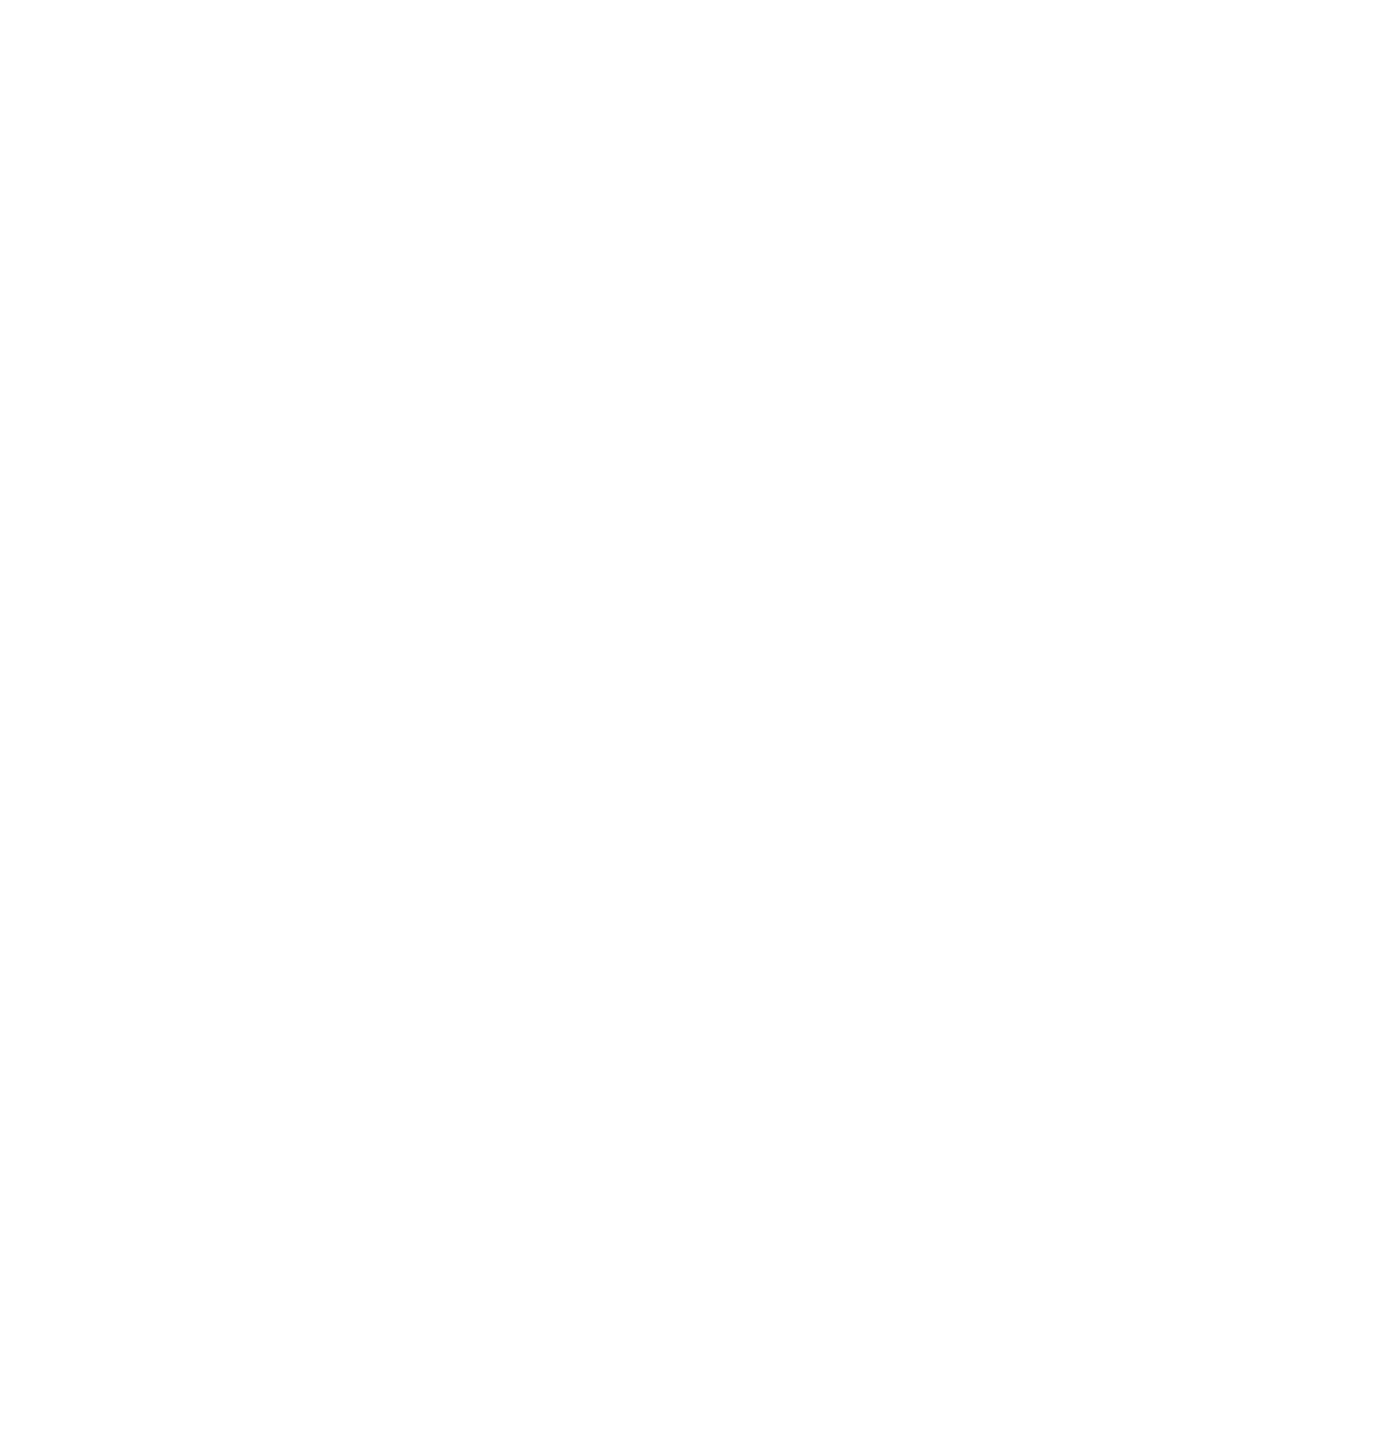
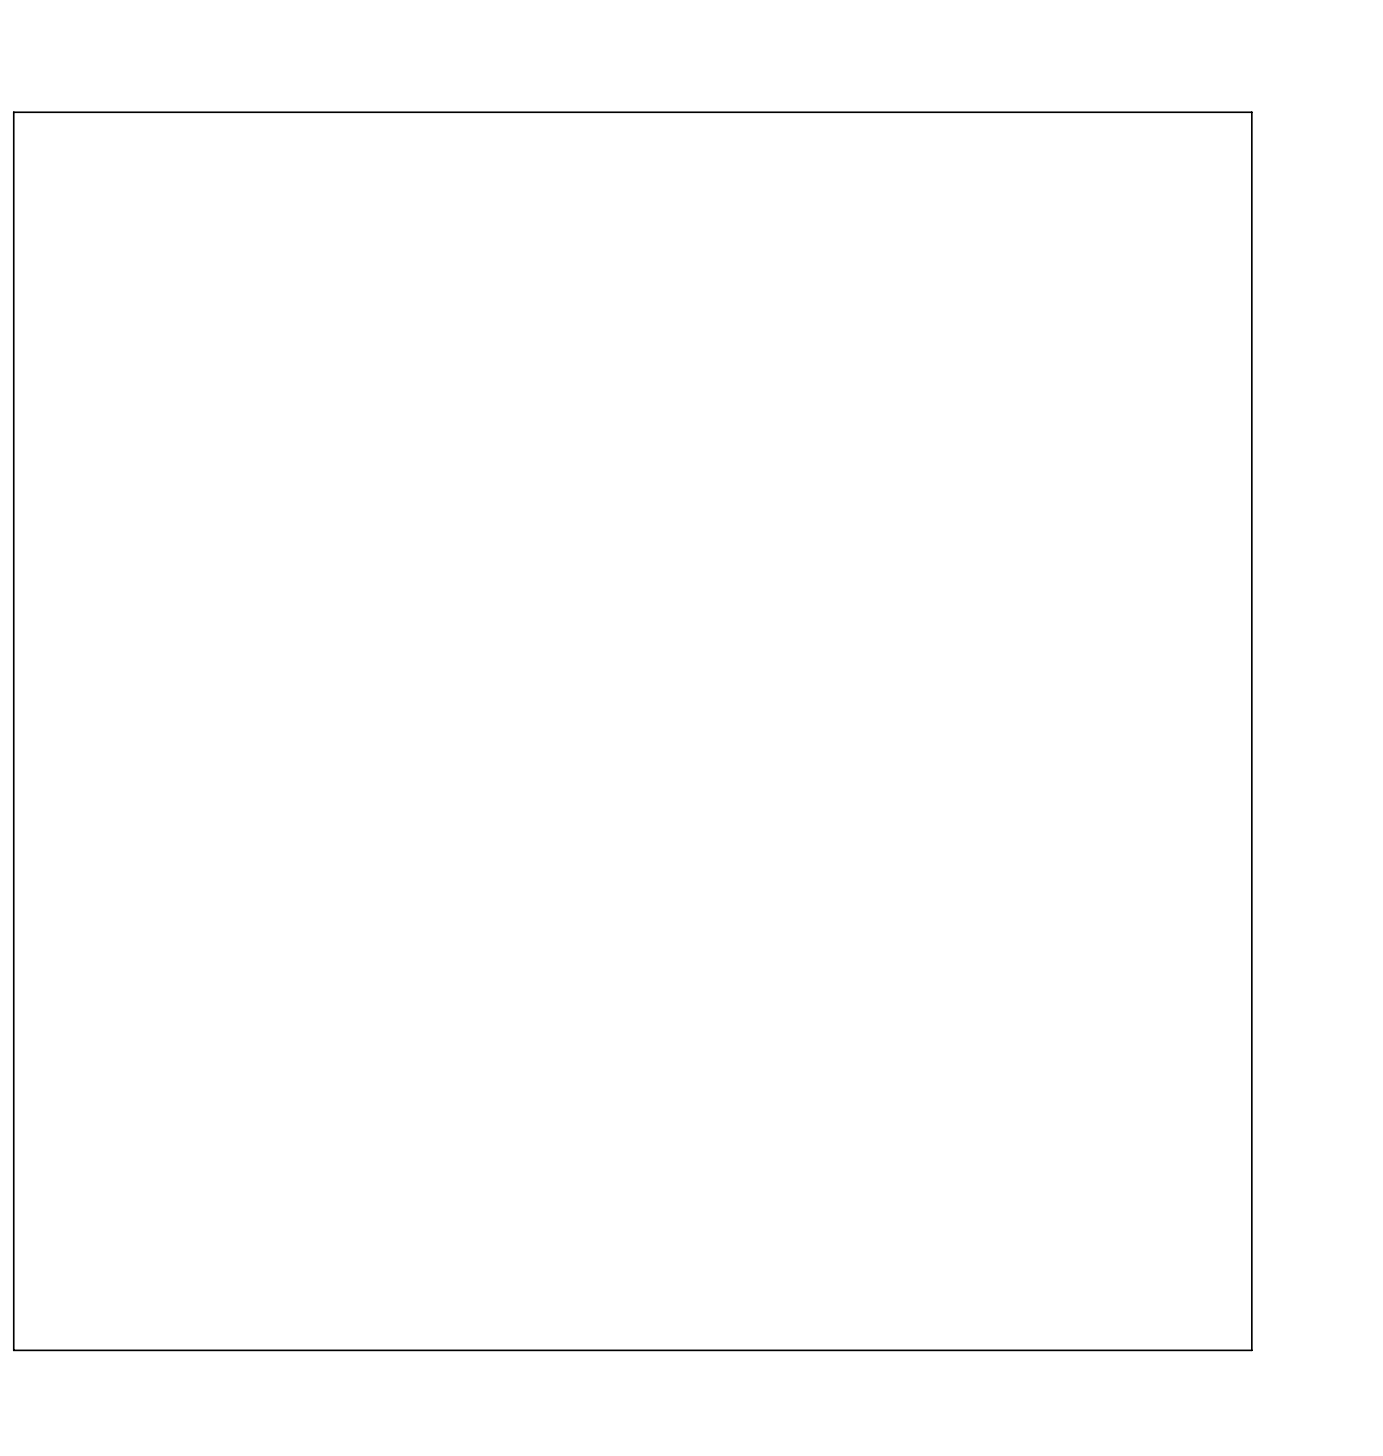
board edge: none -> (13, 112) (1251, 112) (1251, 1350) (13, 1350) (13, 112)

